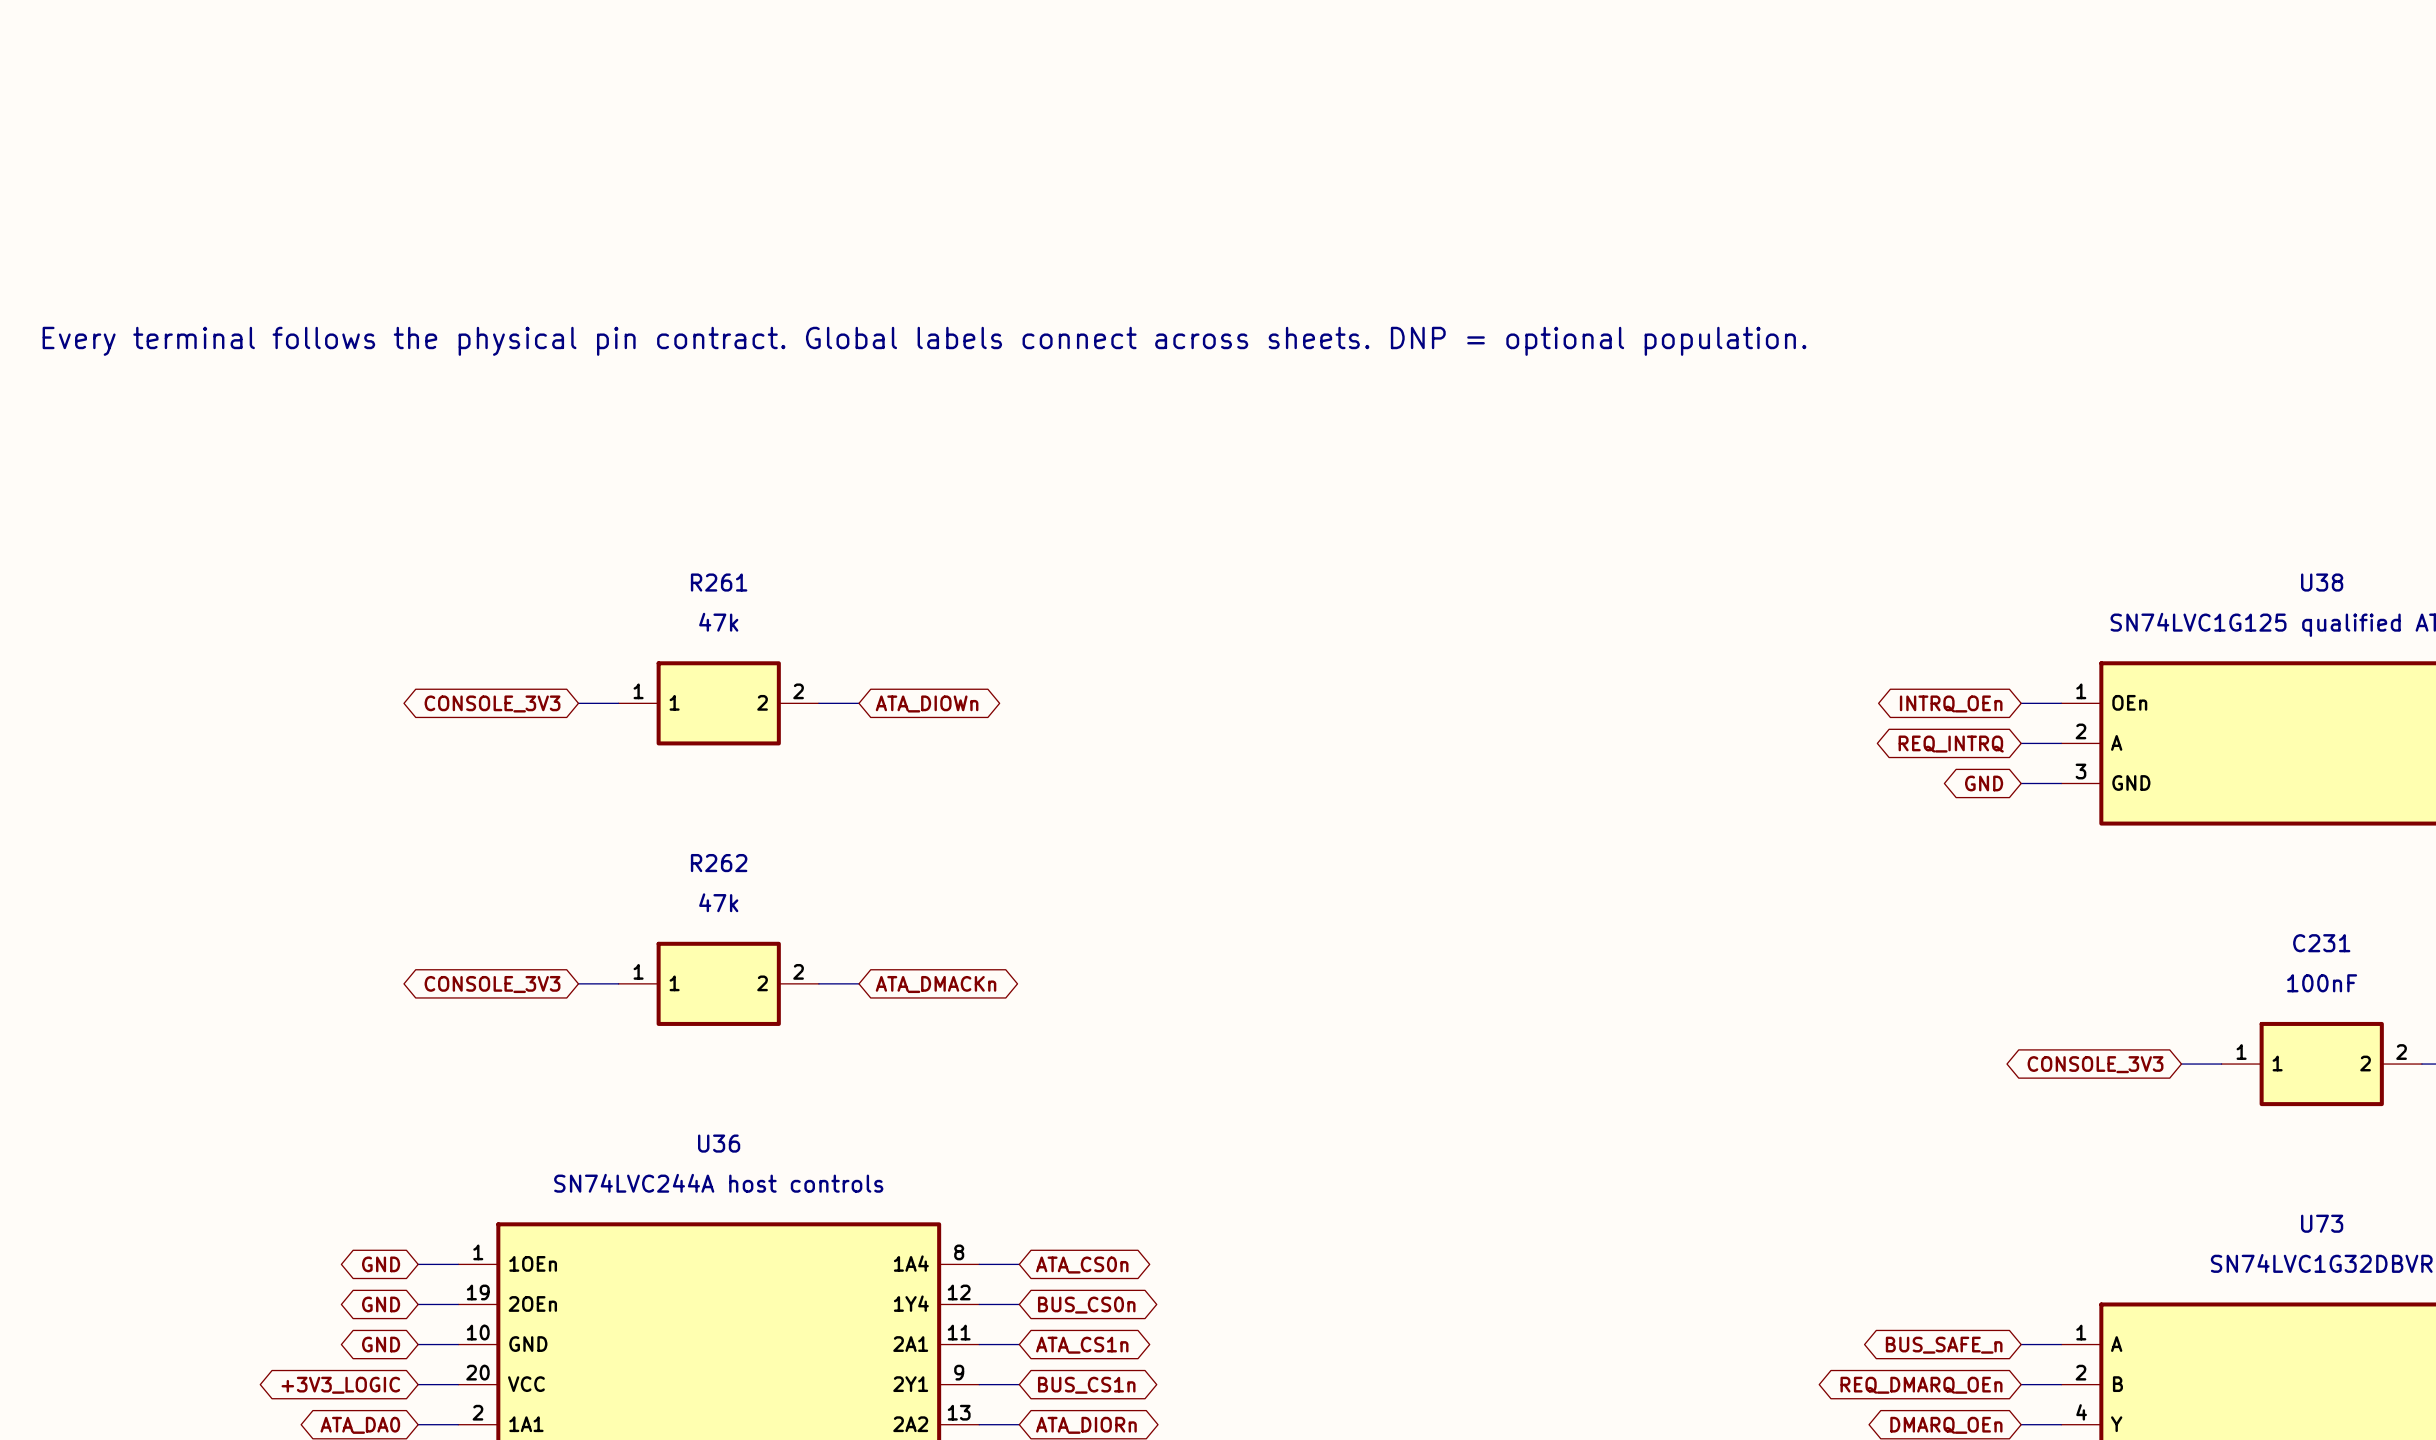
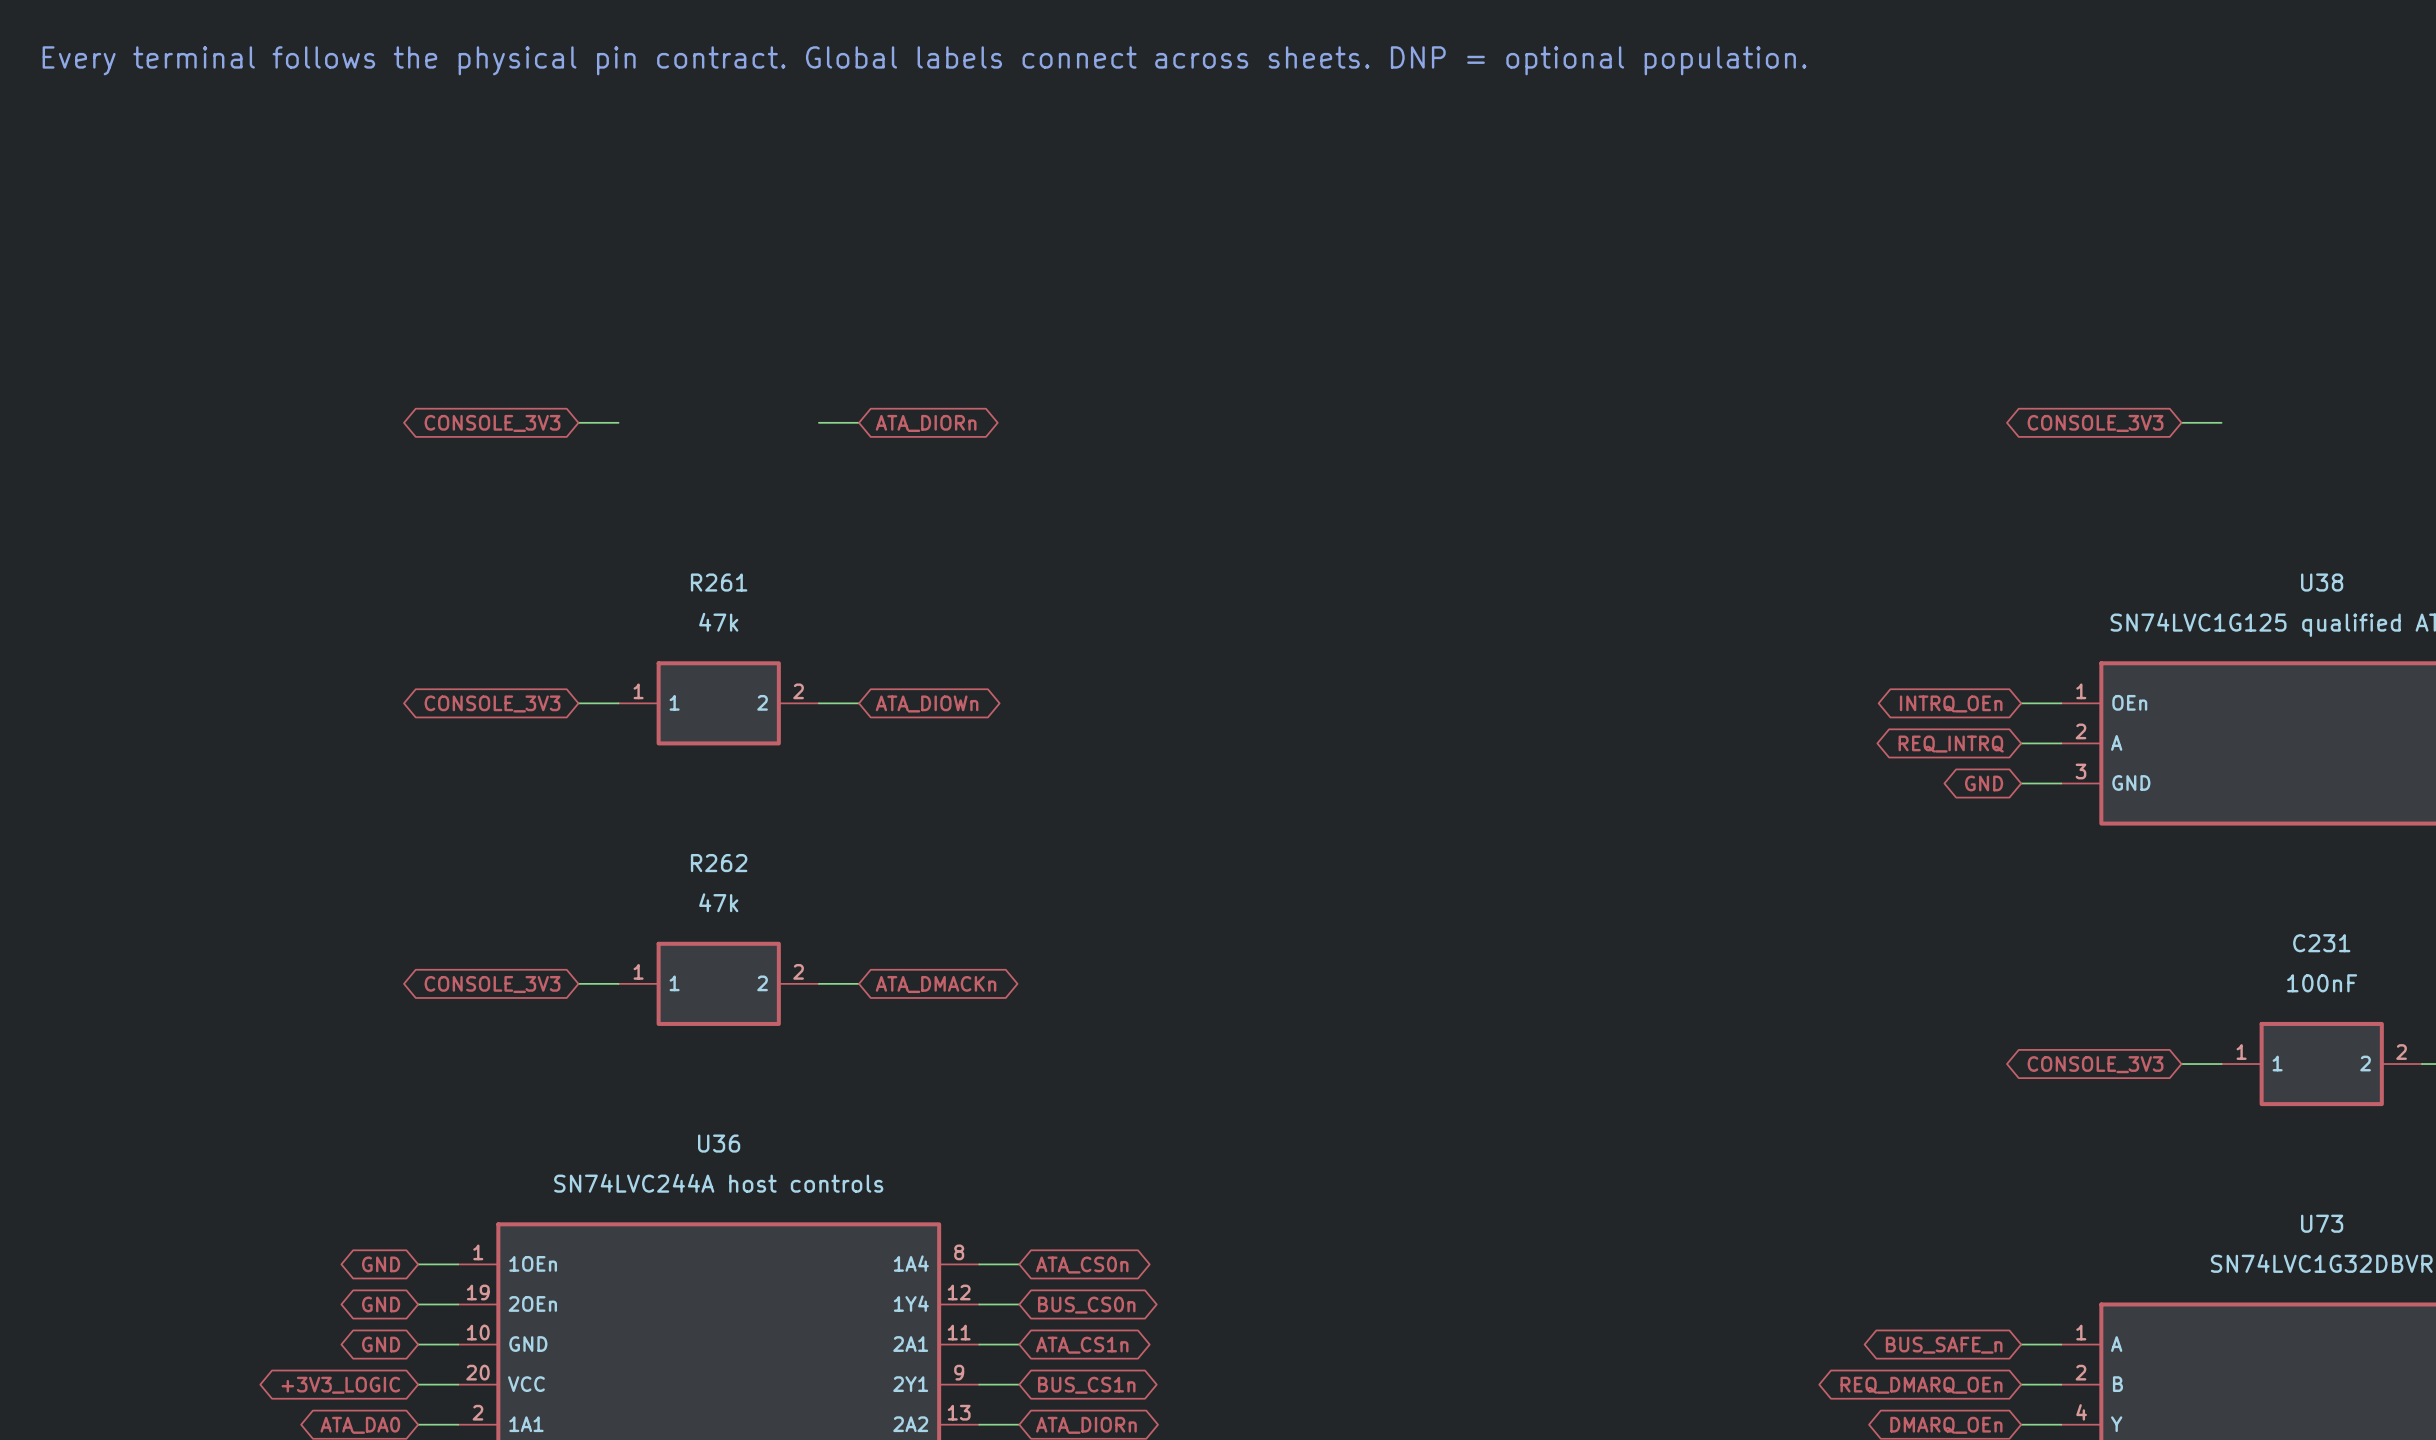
text position: Every terminal follows the physical pin contract. Global labels connect across sheets. DNP = optional population. (924, 341) -> Every terminal follows the physical pin contract. Global labels connect across sheets. DNP = optional population. (924, 60)
wire: none -> (578, 422) (618, 422)
wire: none -> (818, 422) (859, 422)
wire: none -> (2181, 422) (2221, 422)
global label: none -> CONSOLE_3V3 (492, 423)
global label: none -> ATA_DIORn (926, 423)
global label: none -> CONSOLE_3V3 (2095, 423)

